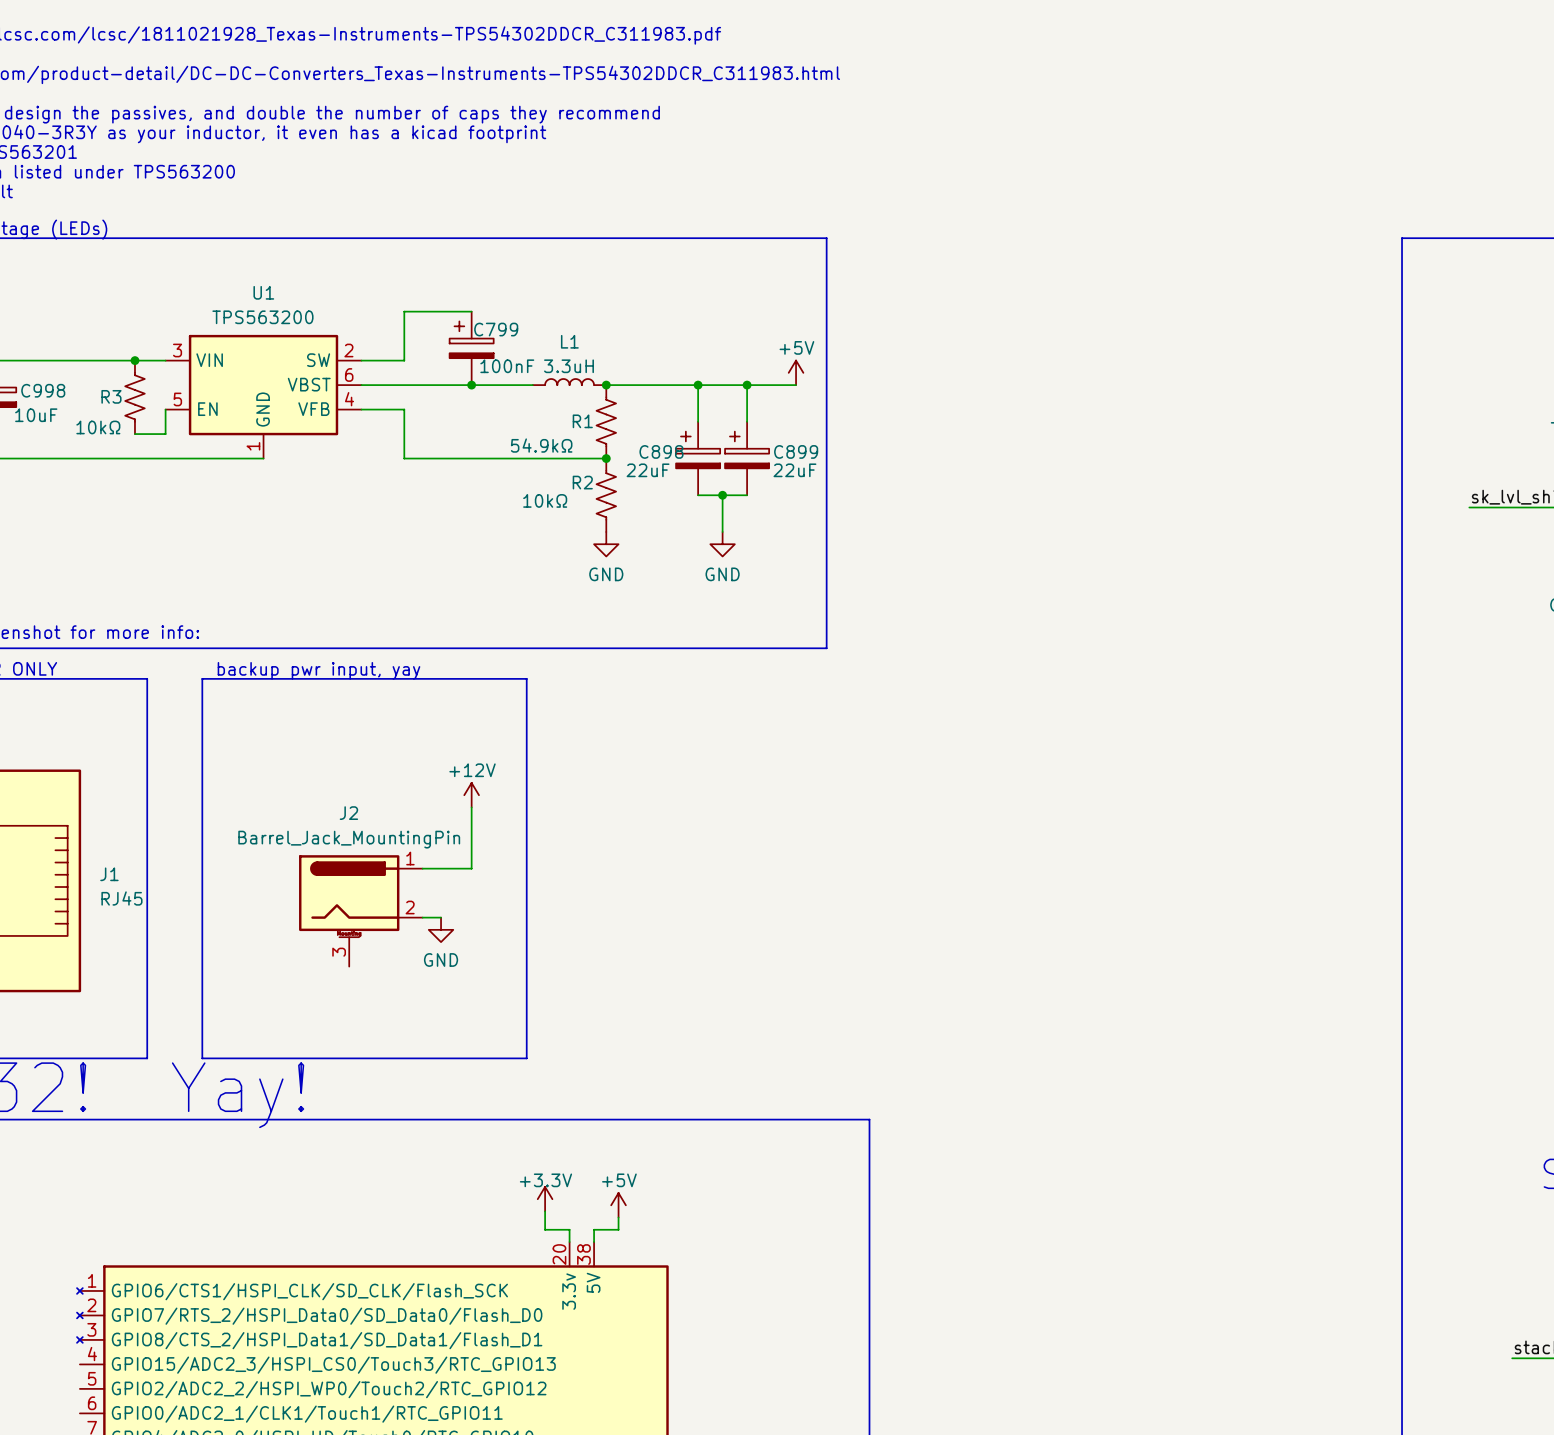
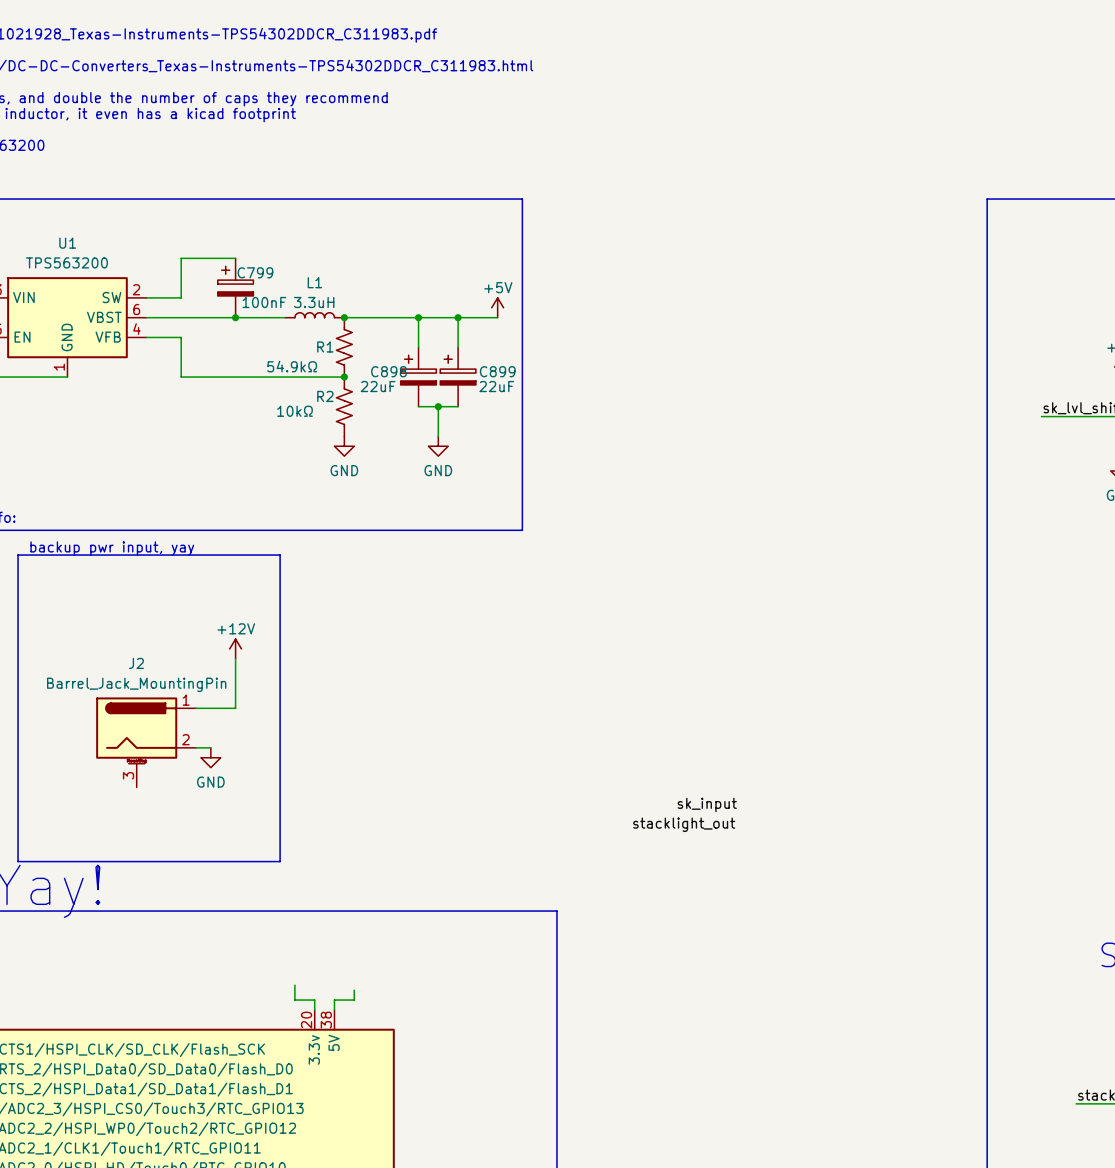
label: none -> sk_input (707, 804)
label: none -> stacklight_out (684, 824)
power symbol: +3.3V (545, 1199) -> none
power symbol: +5V (618, 1205) -> none

